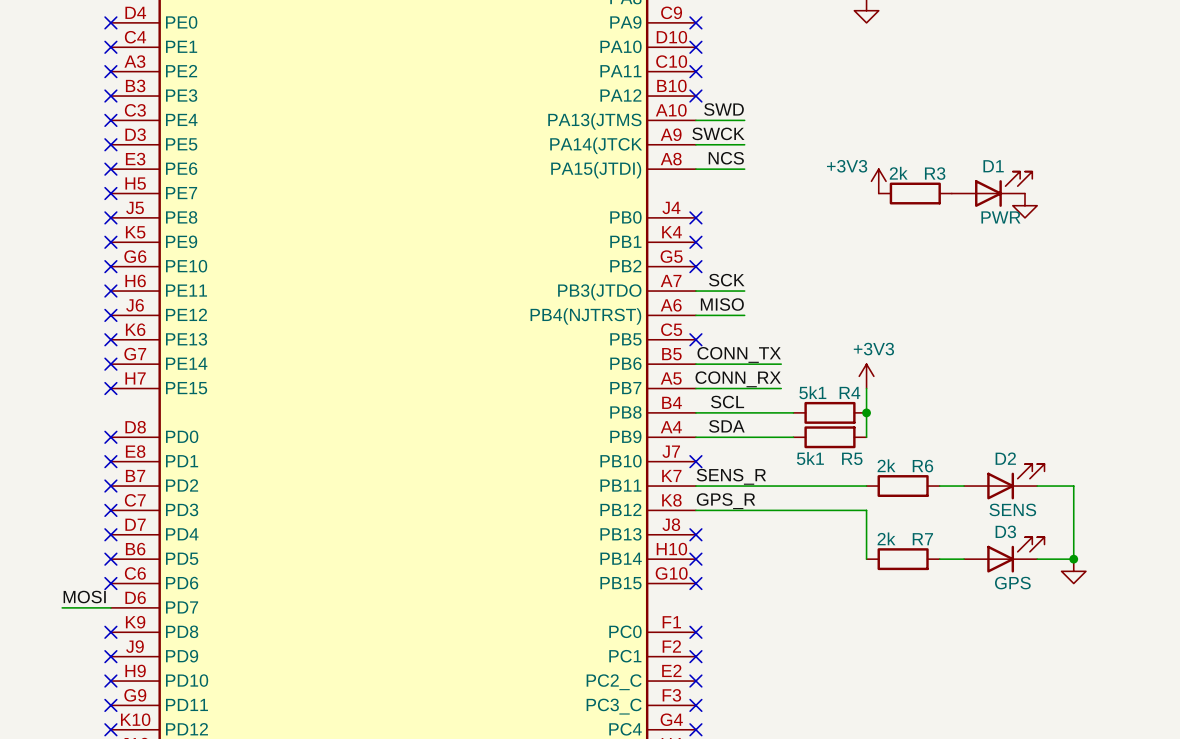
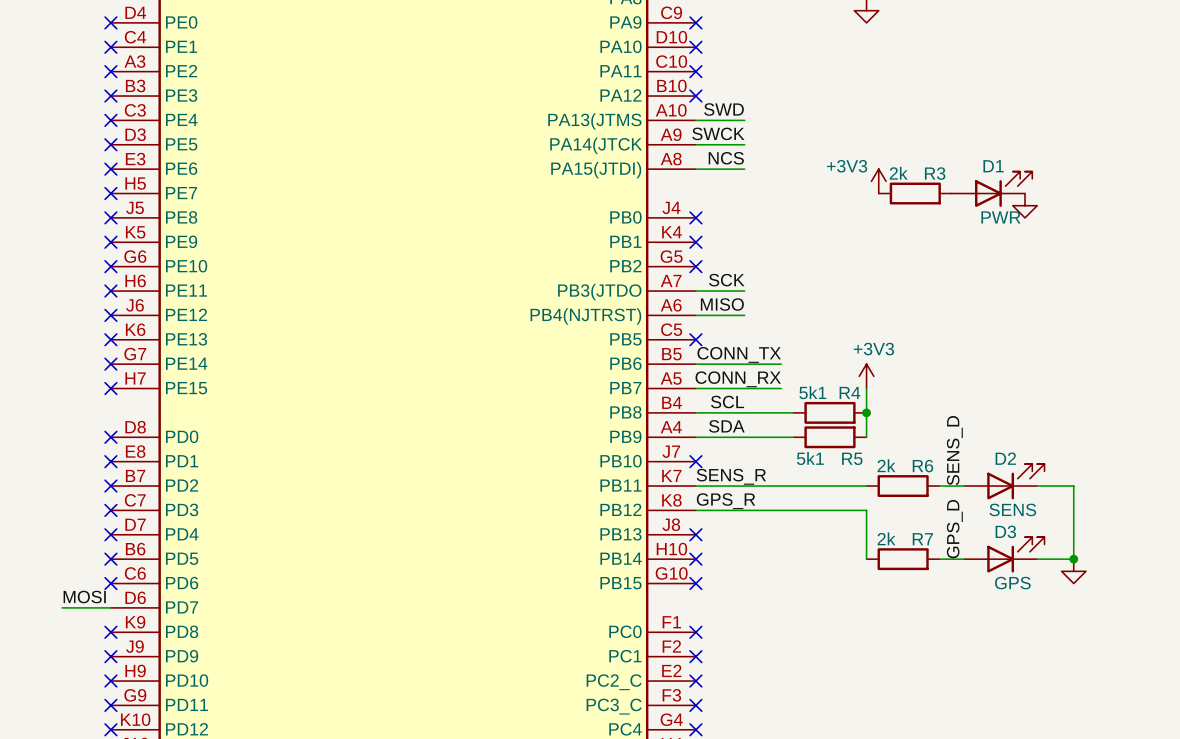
label: none -> SENS_D (954, 450)
label: none -> GPS_D (954, 529)

